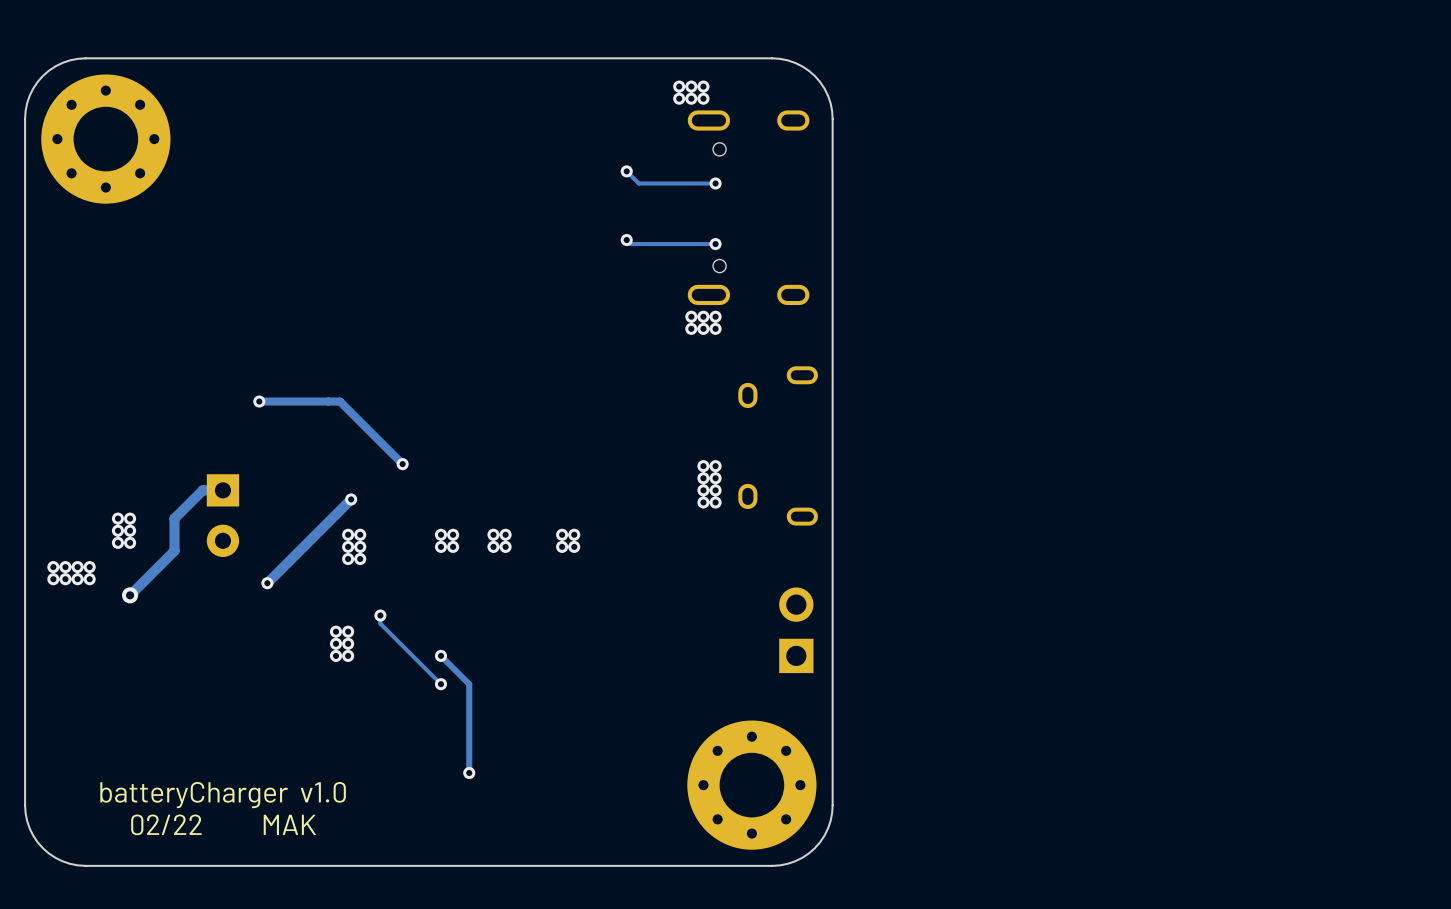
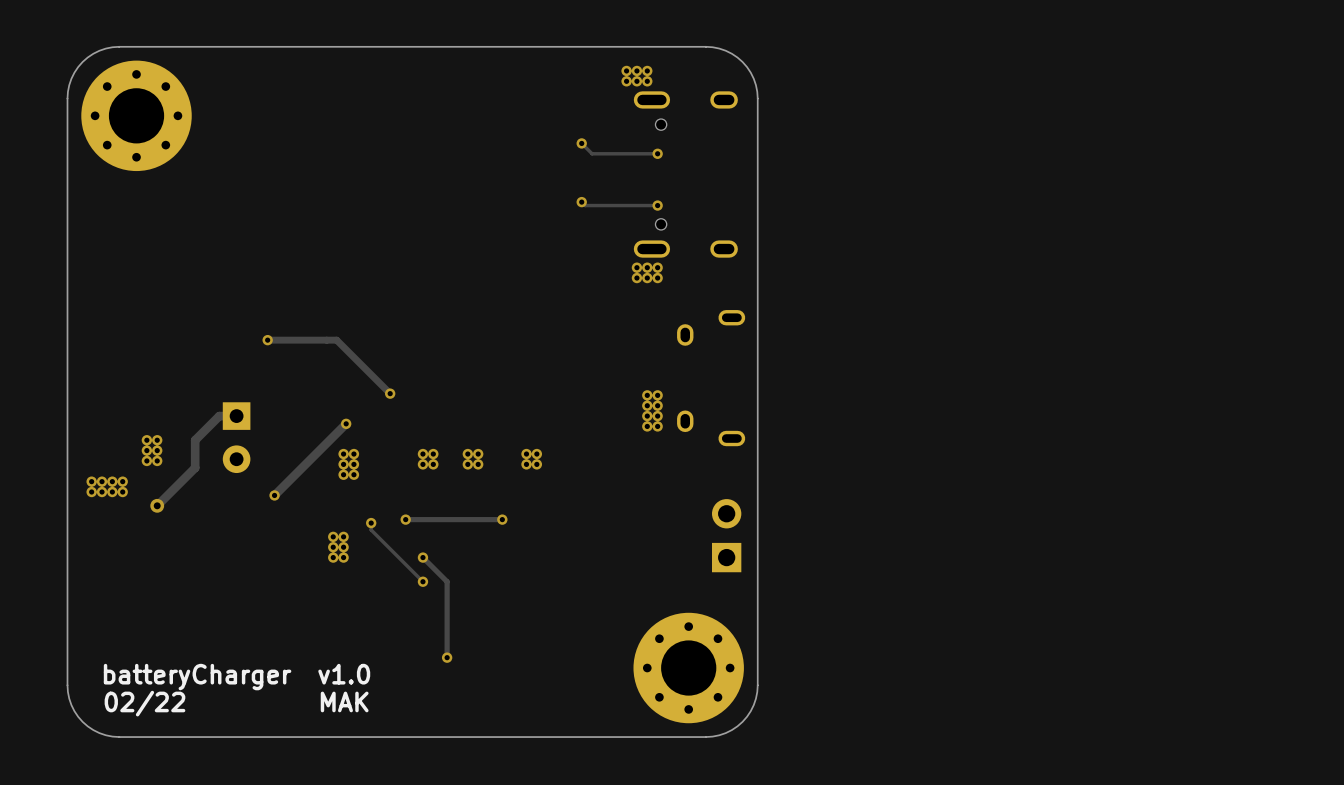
via: none -> (405, 519)
track: none -> (502, 519) (405, 519)
via: none -> (502, 519)

